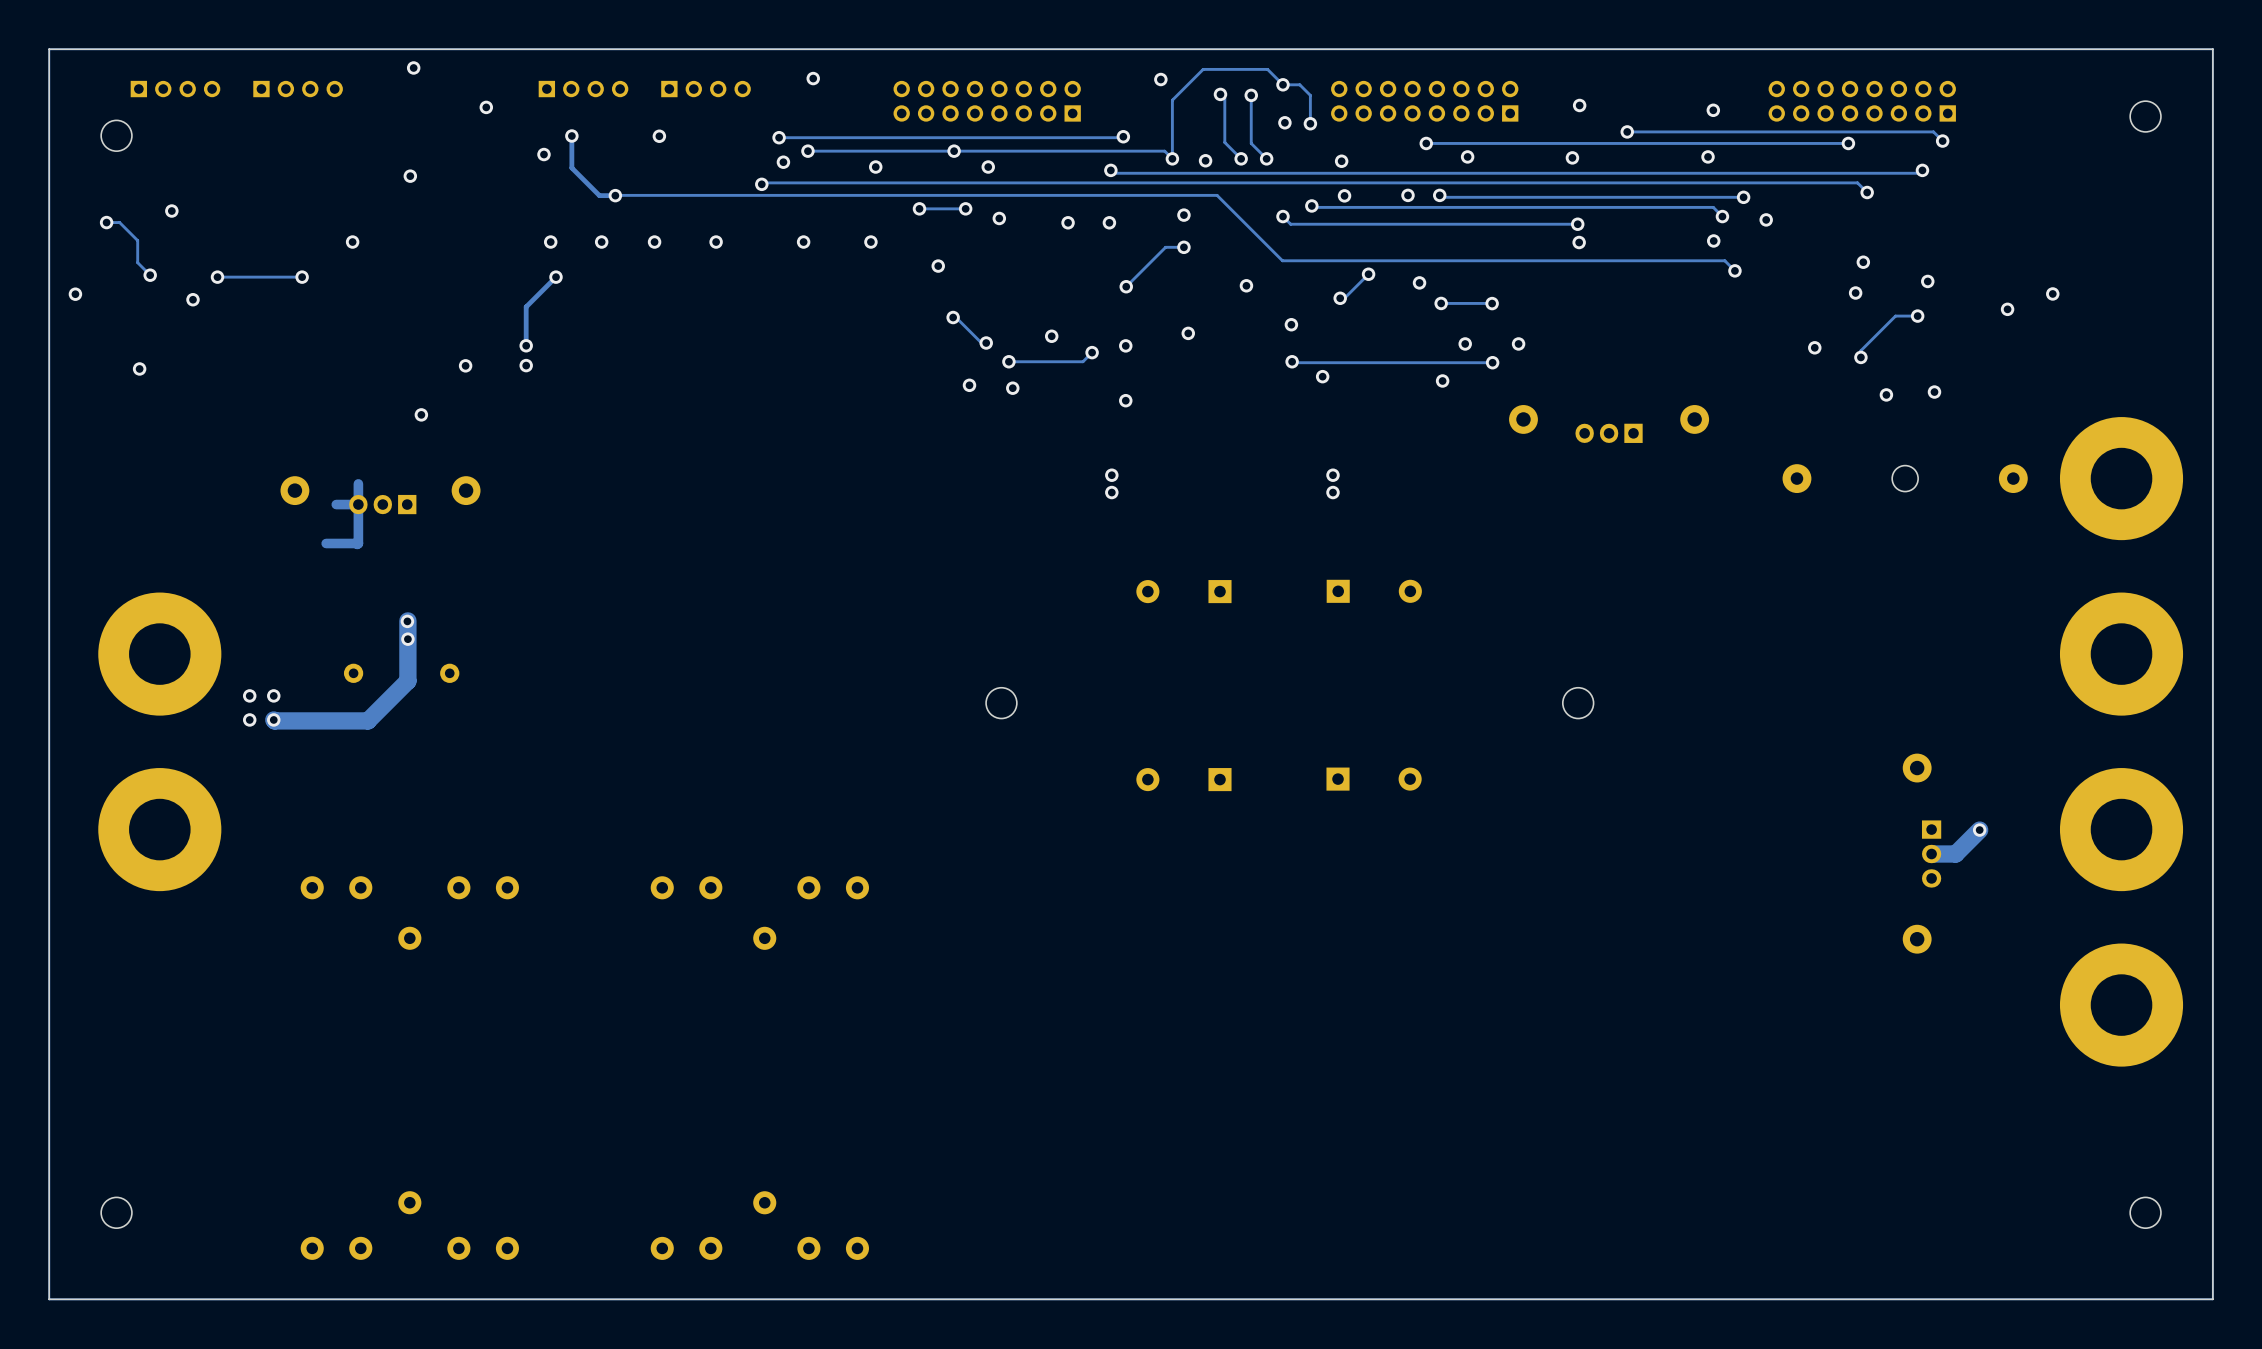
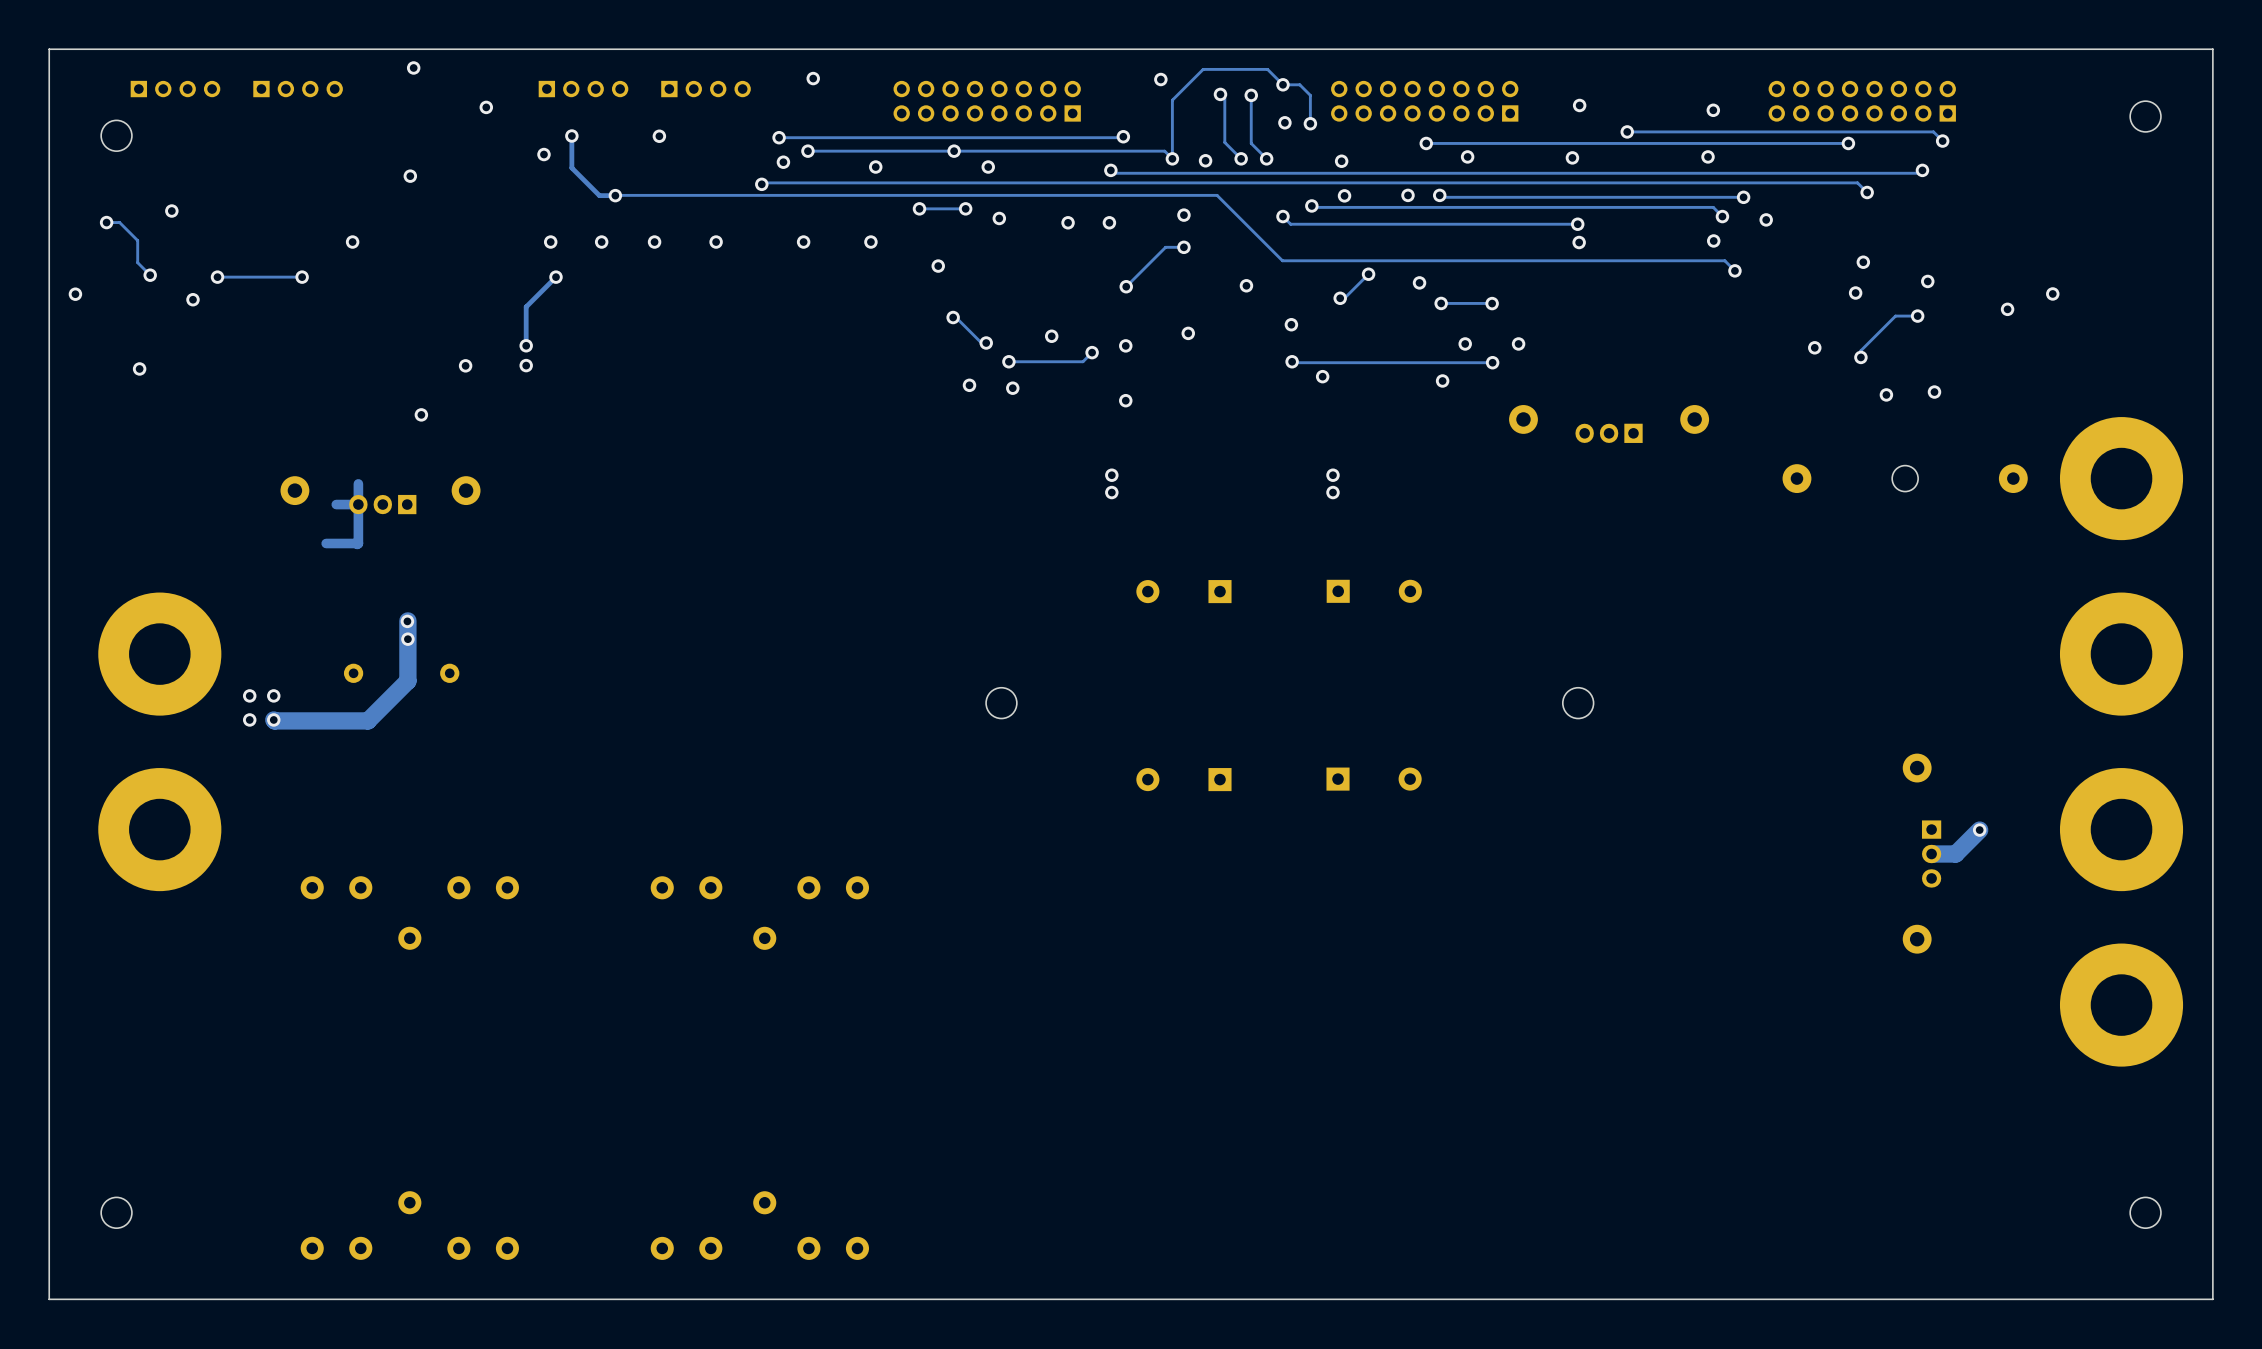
track: (2212, 49) (2212, 1299) (49, 1299) (49, 49) (2212, 49) -> none

